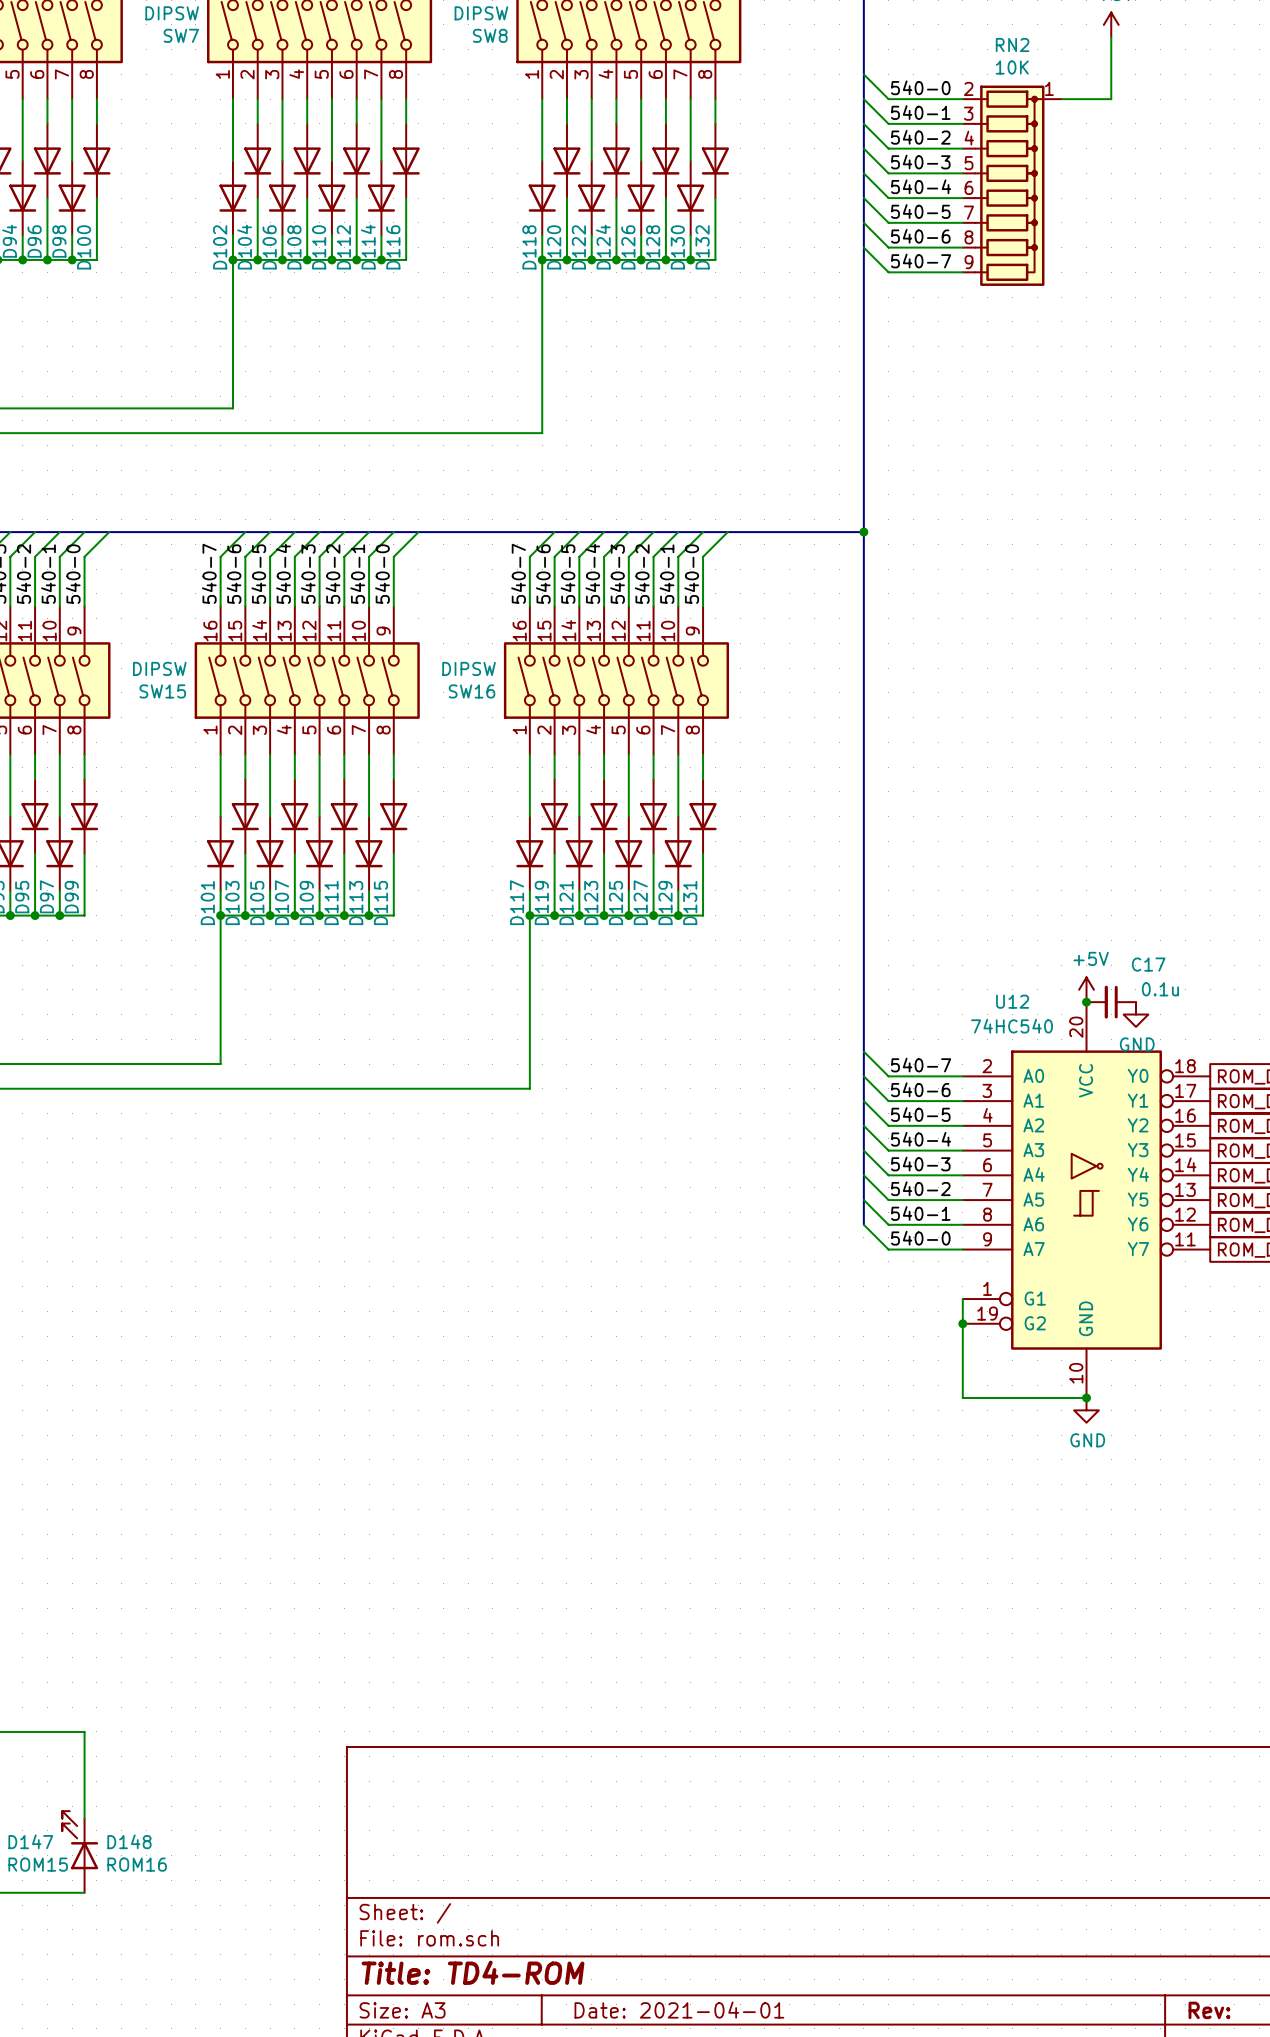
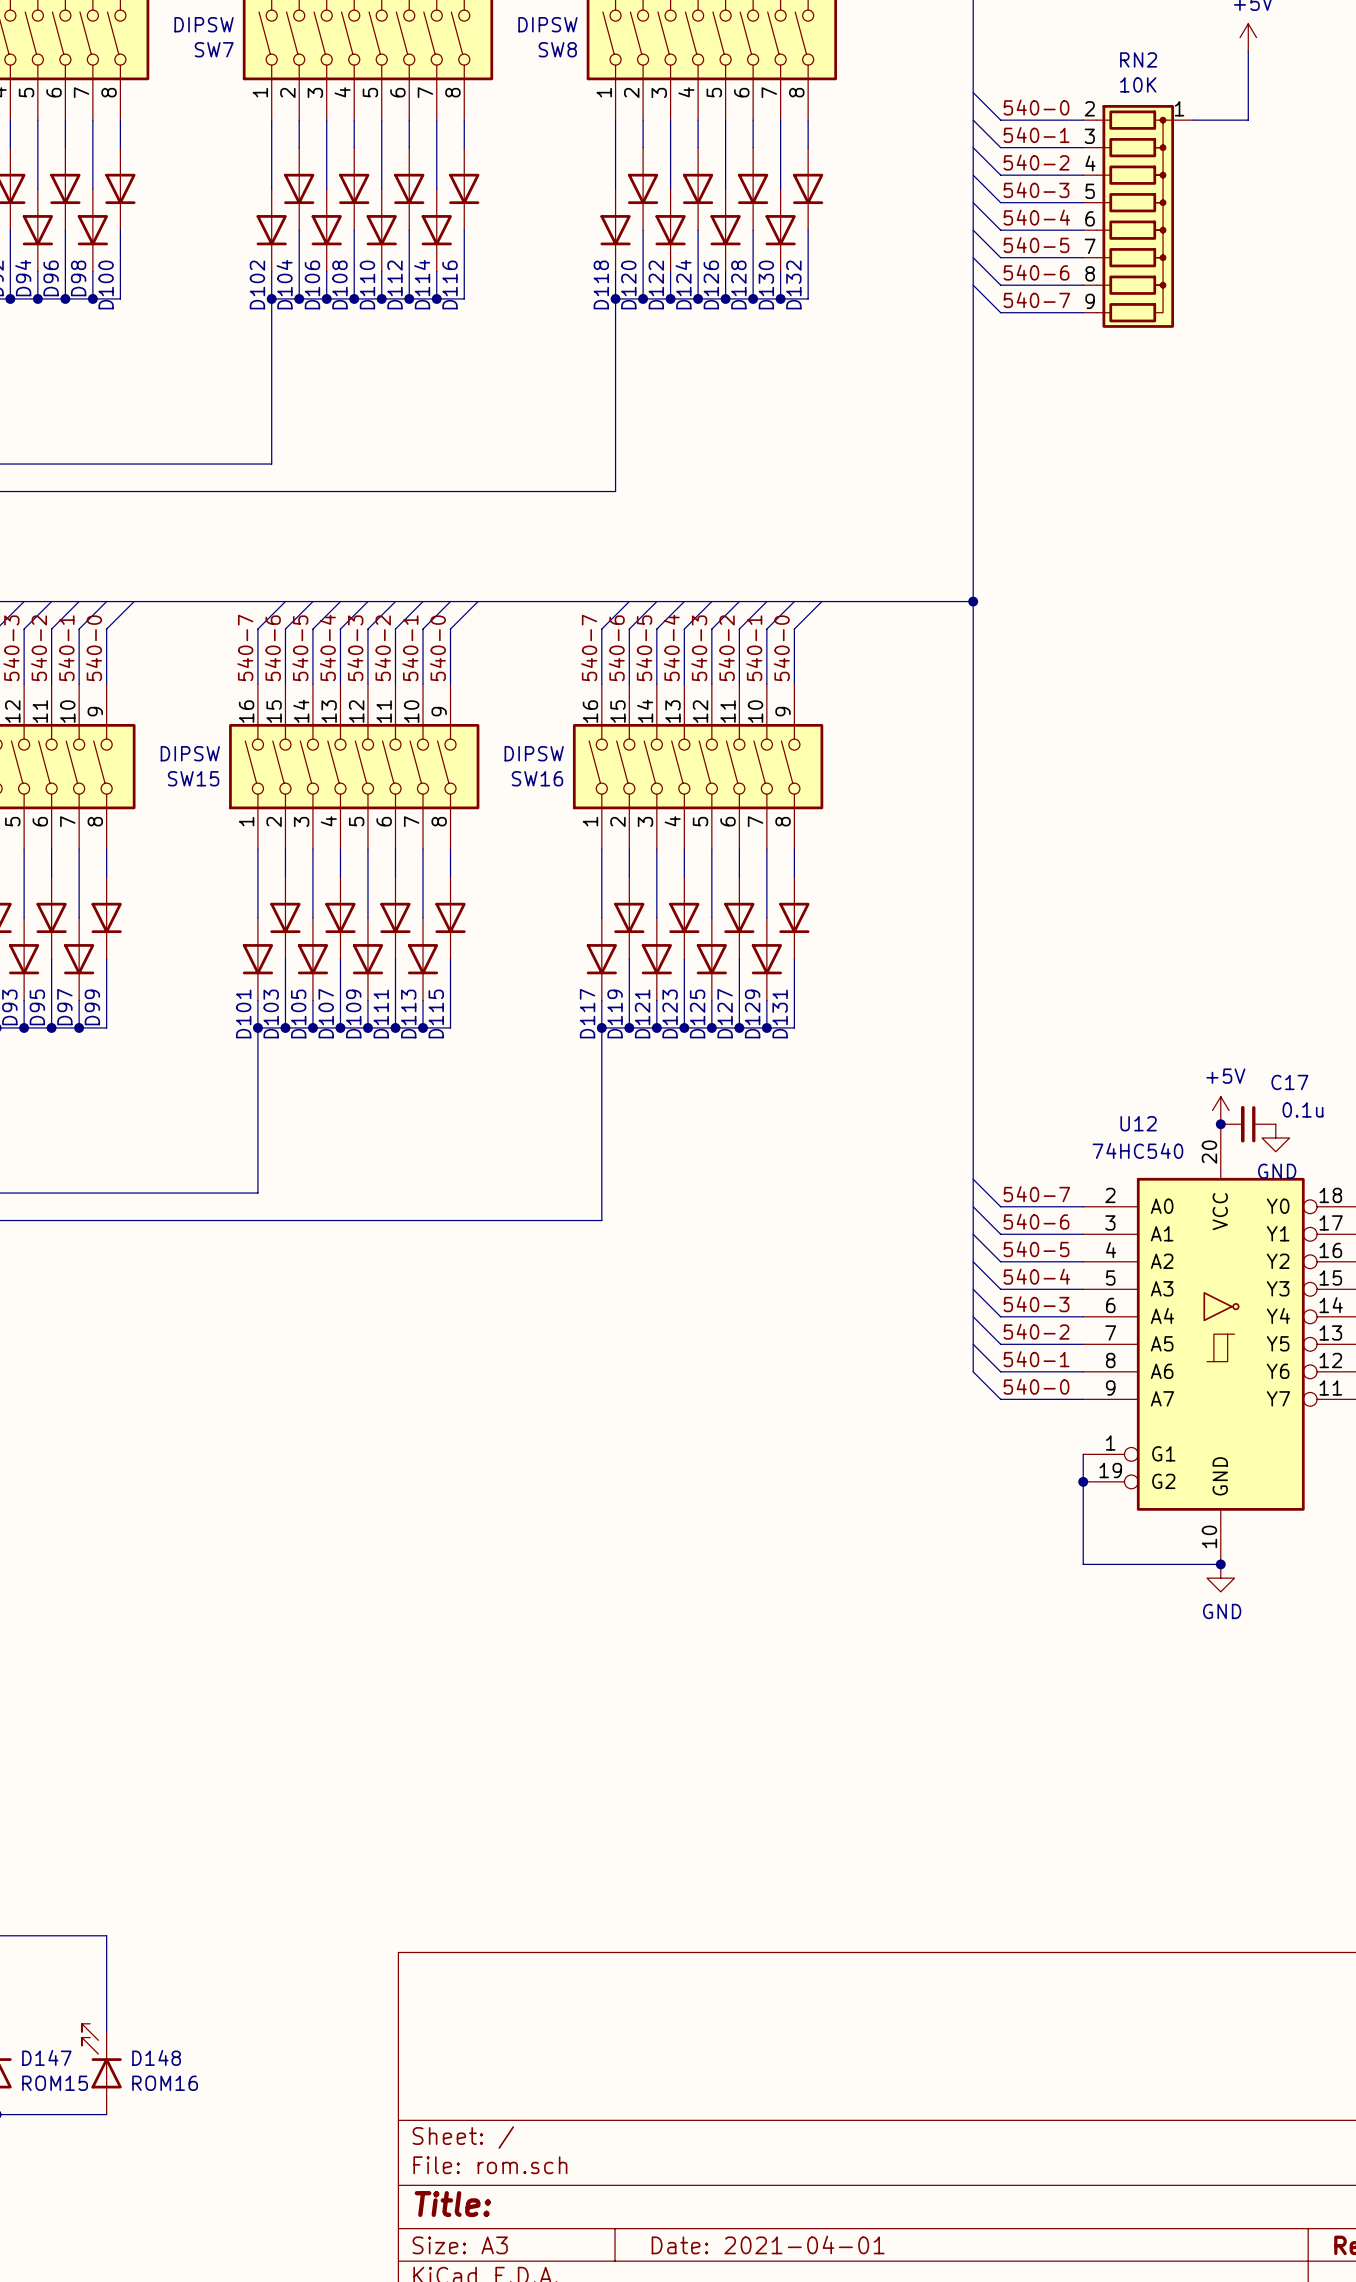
title block: Title: TD4-ROM (472, 1972) -> Title: (452, 2204)

